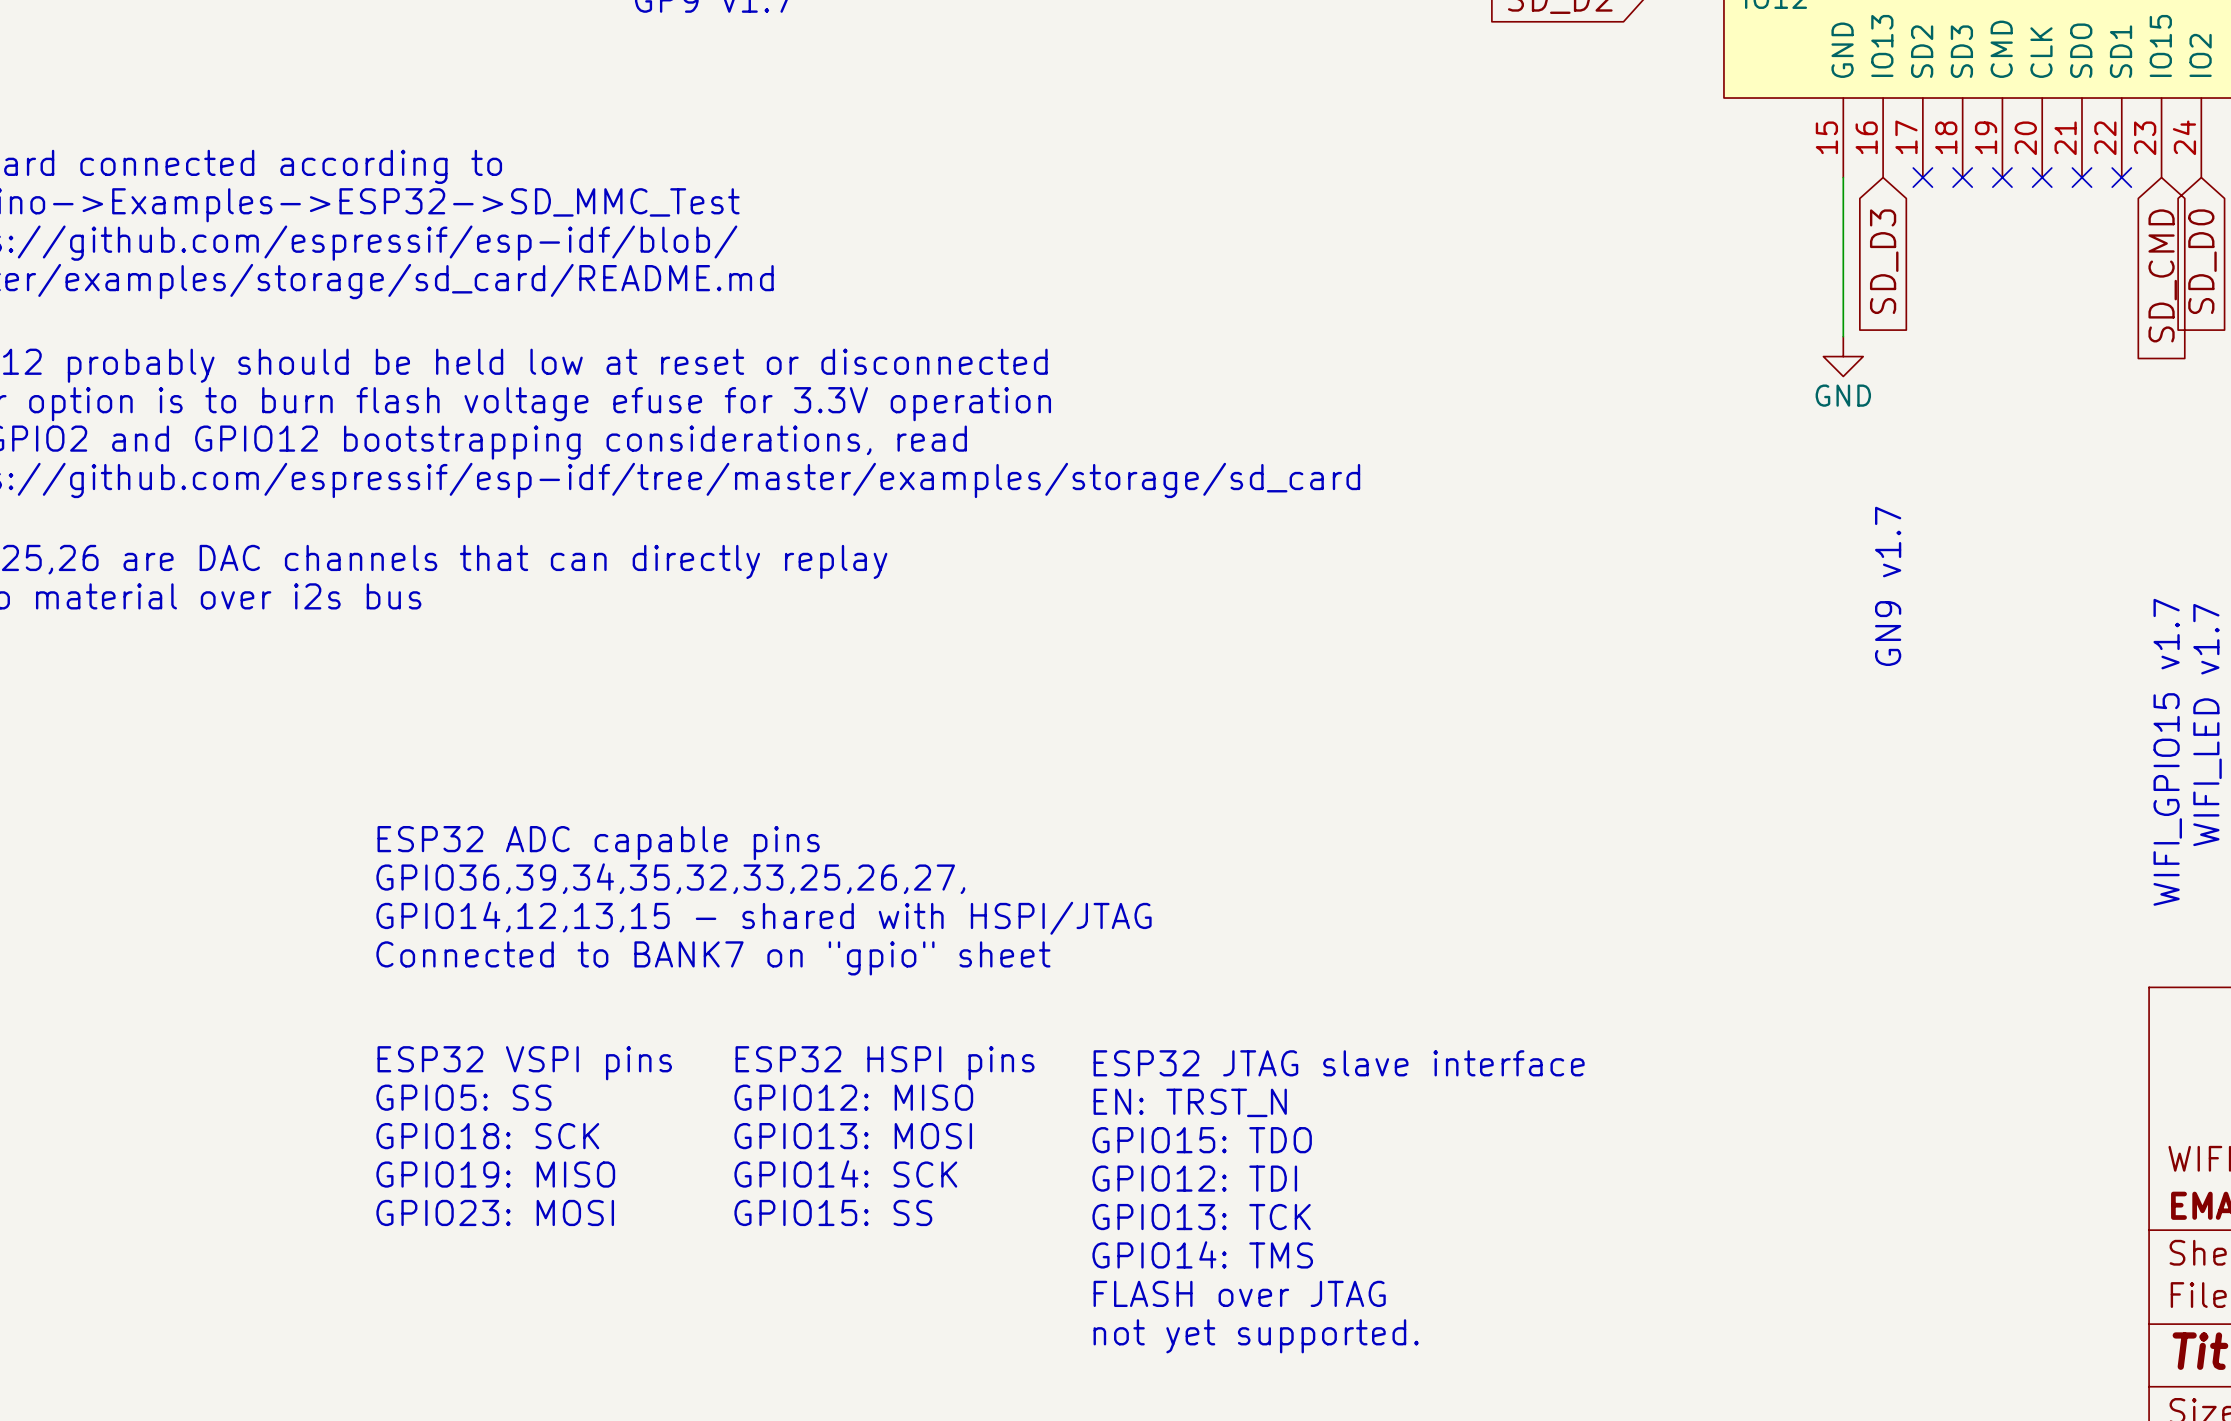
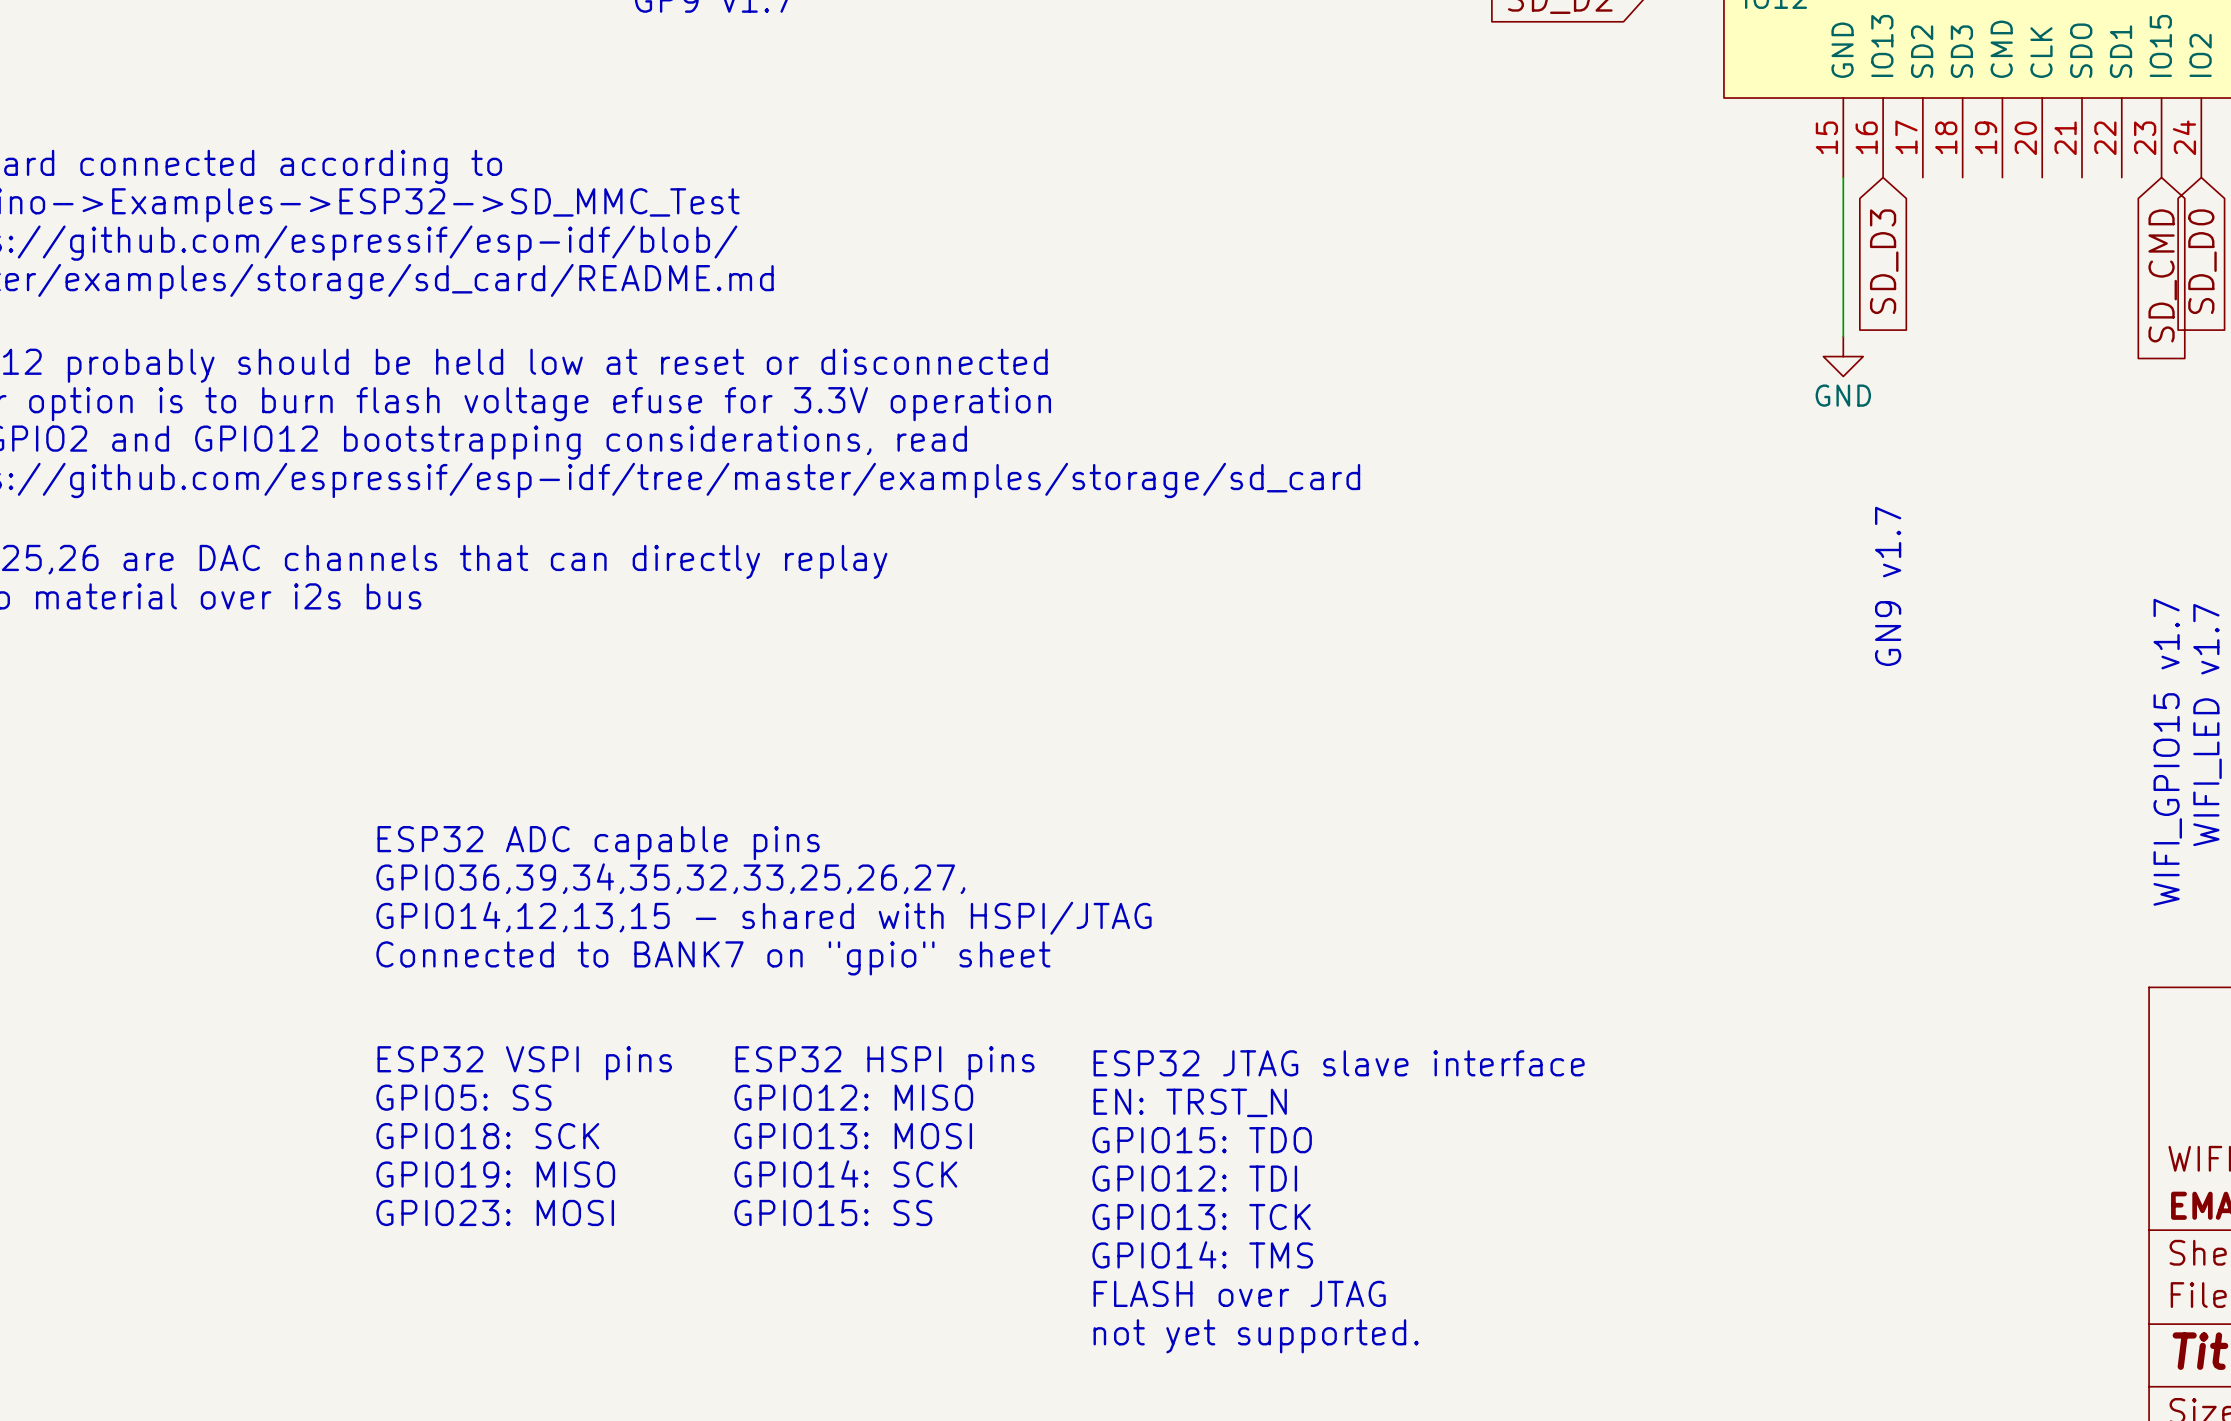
no-connect mark: (1922, 177) -> none
no-connect mark: (1962, 177) -> none
no-connect mark: (2002, 177) -> none
no-connect mark: (2042, 177) -> none
no-connect mark: (2081, 177) -> none
no-connect mark: (2121, 177) -> none

